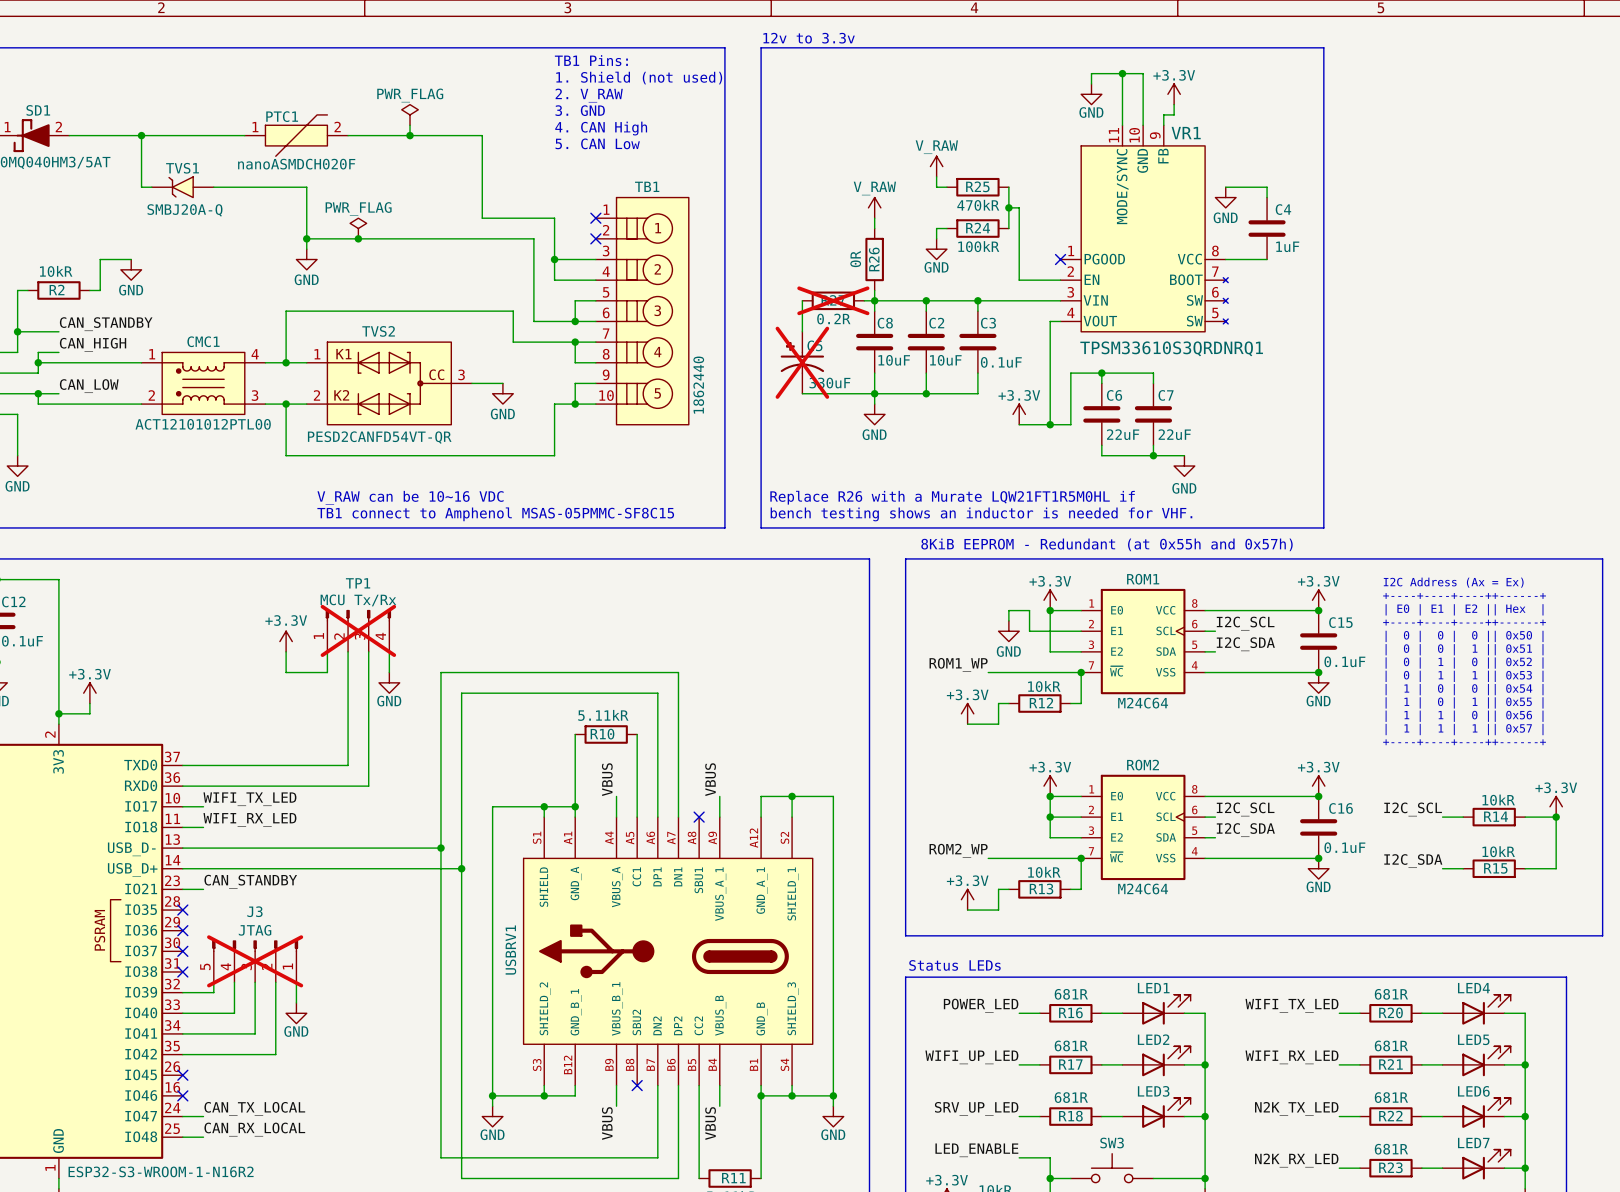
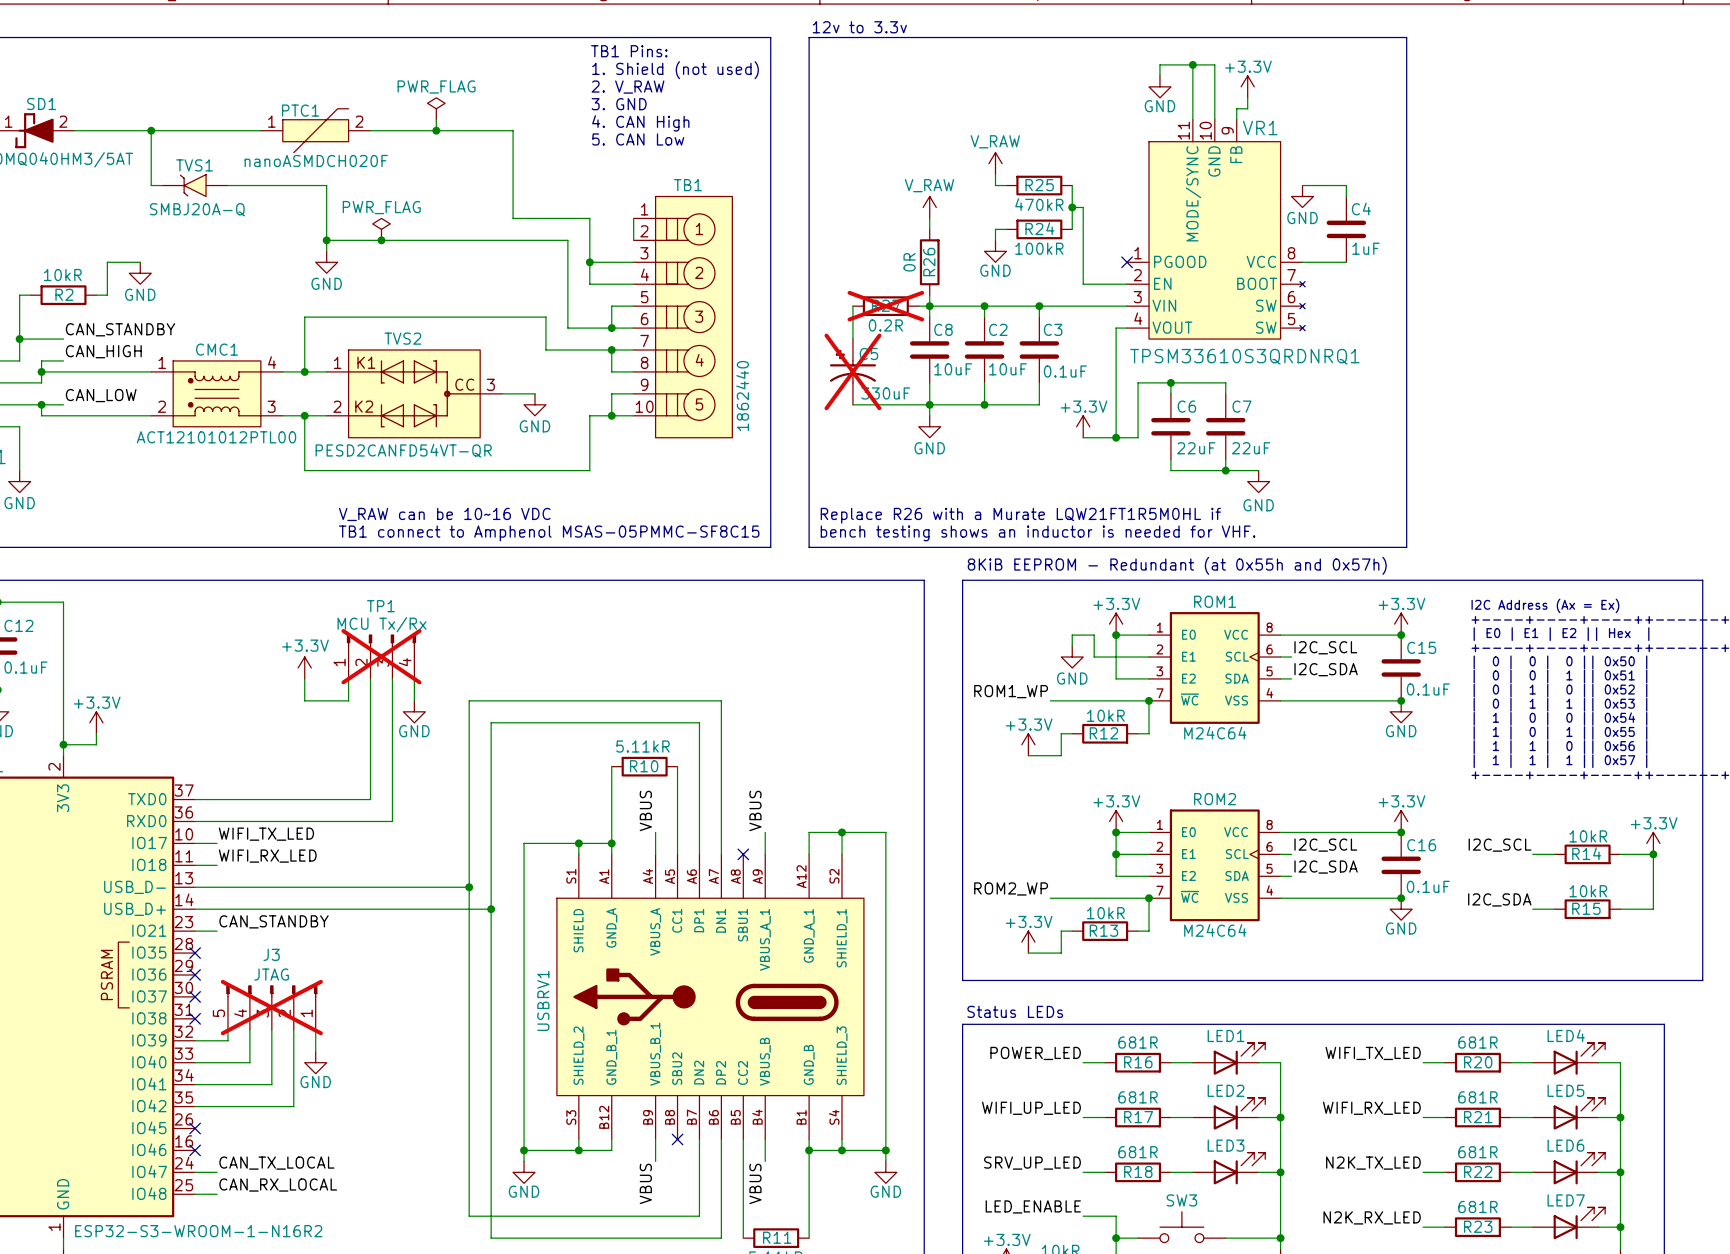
wire: none -> (633, 218) (633, 240)
no-connect mark: (595, 218) -> none
no-connect mark: (595, 238) -> none

